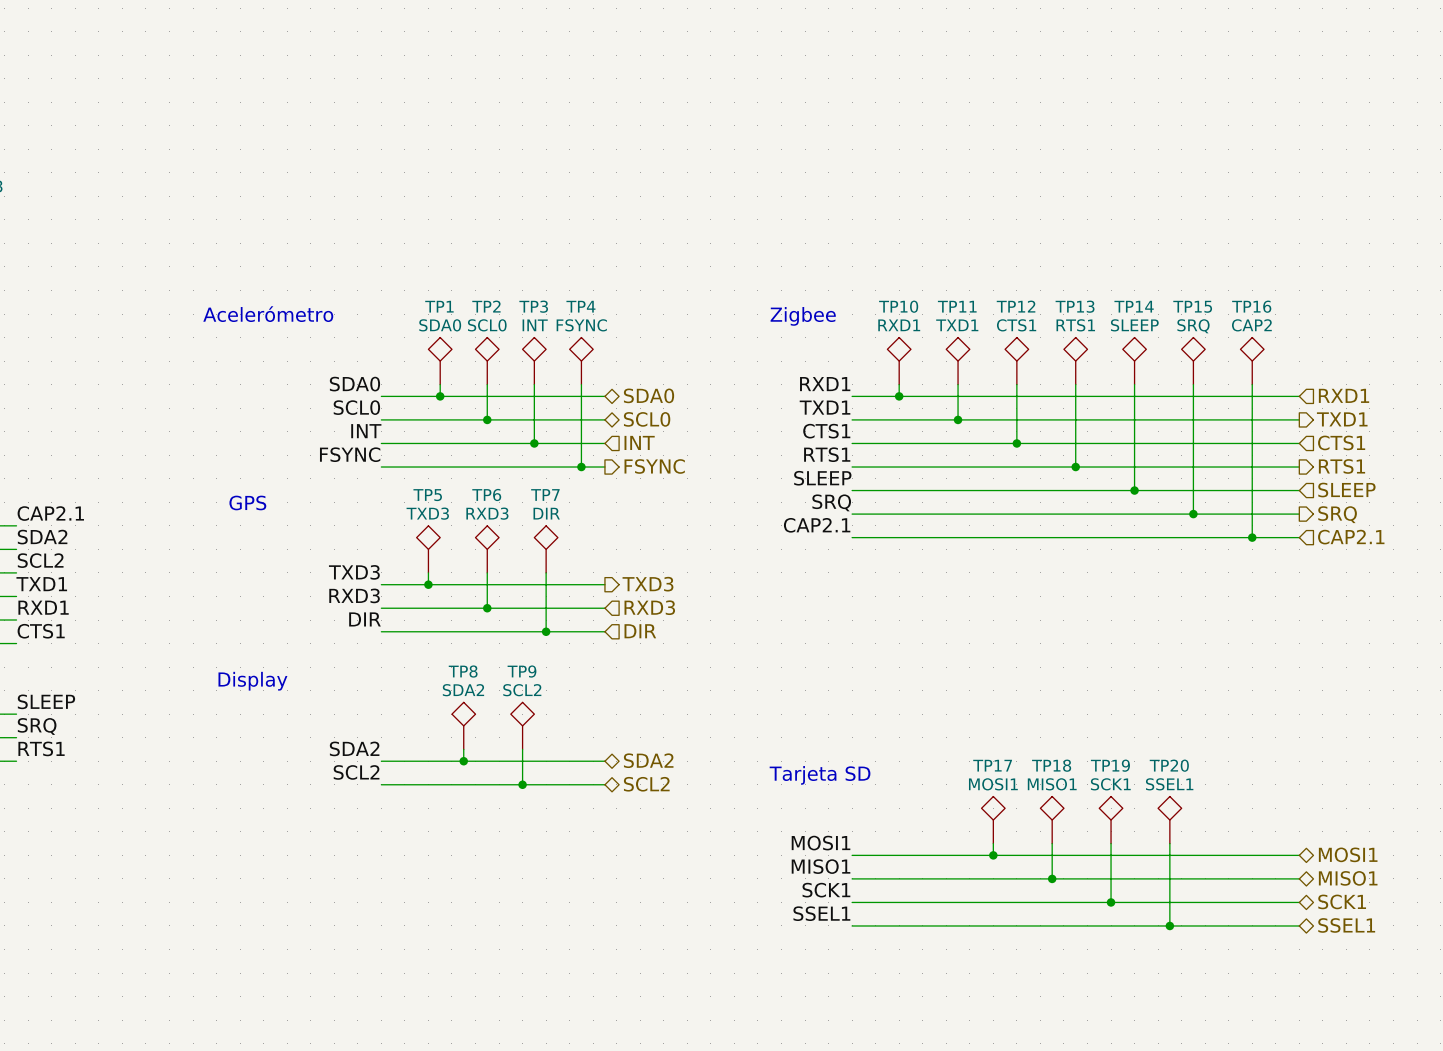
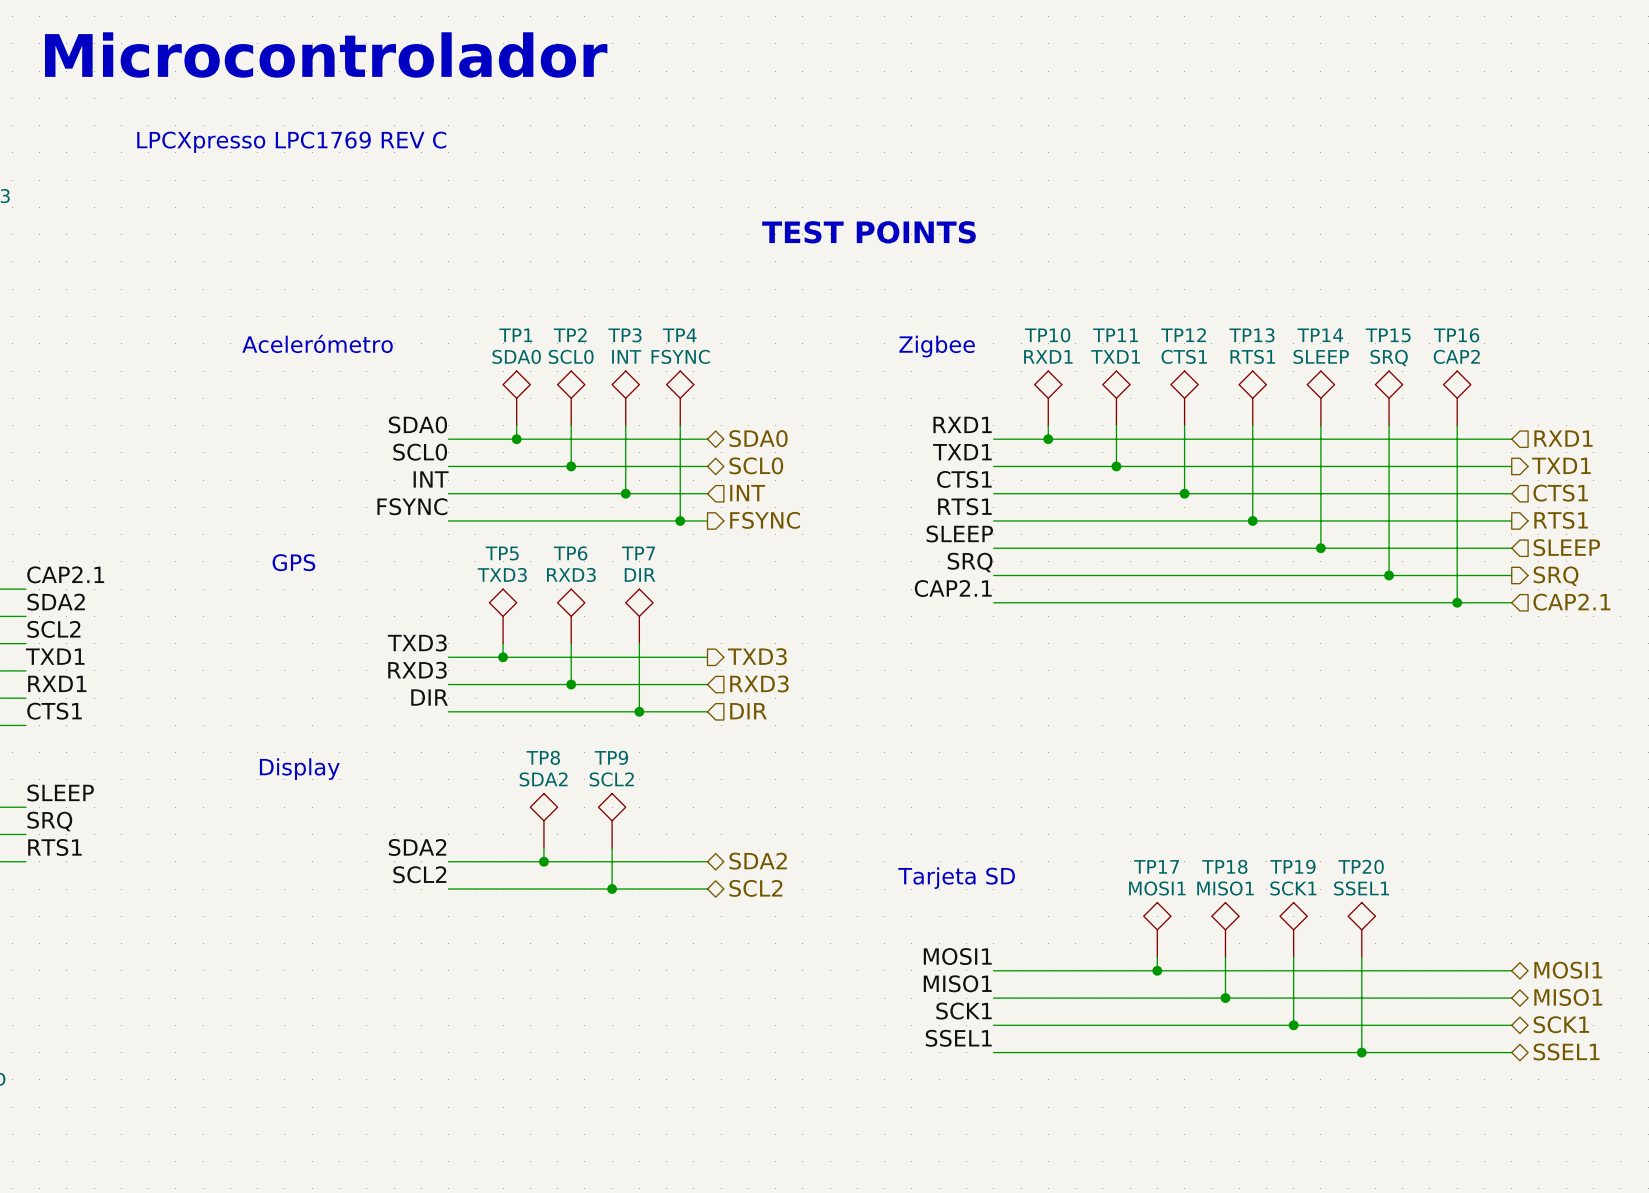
text: none -> Microcontrolador (326, 54)
text: none -> LPCXpresso LPC1769 REV C (291, 142)
text: none -> TEST POINTS (869, 232)

